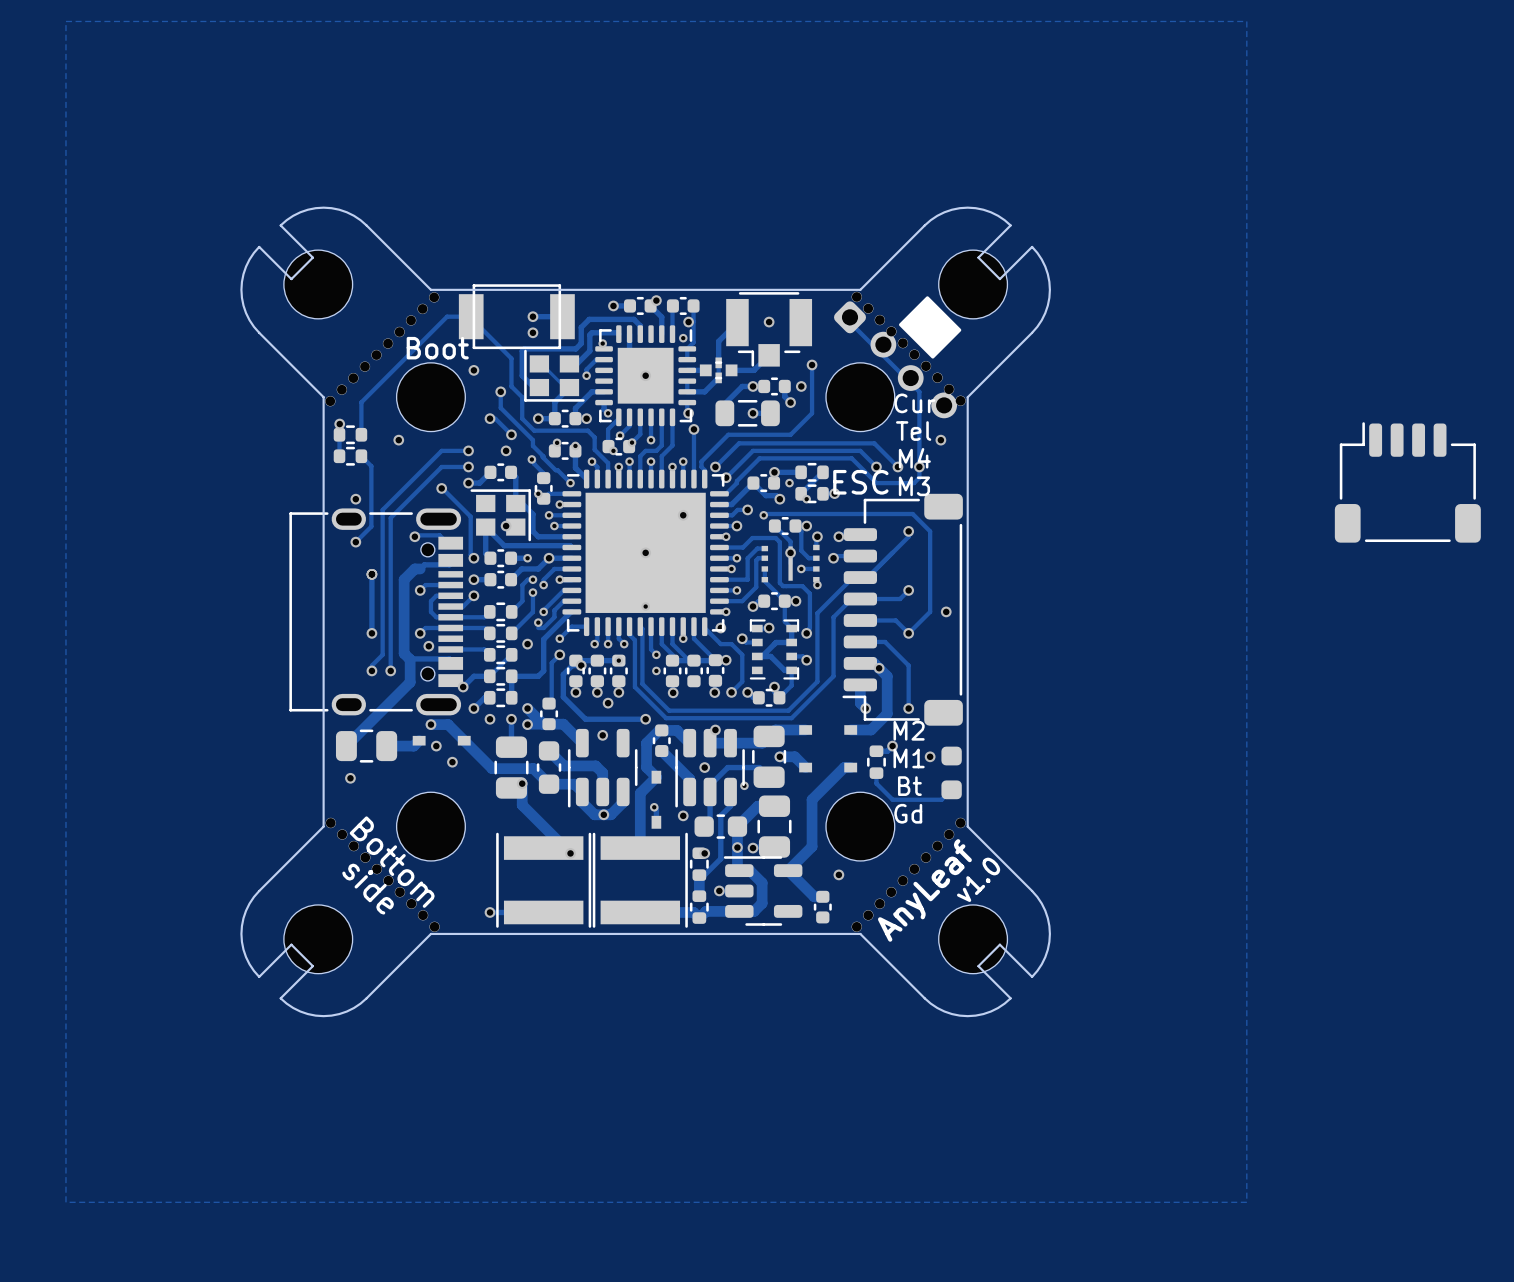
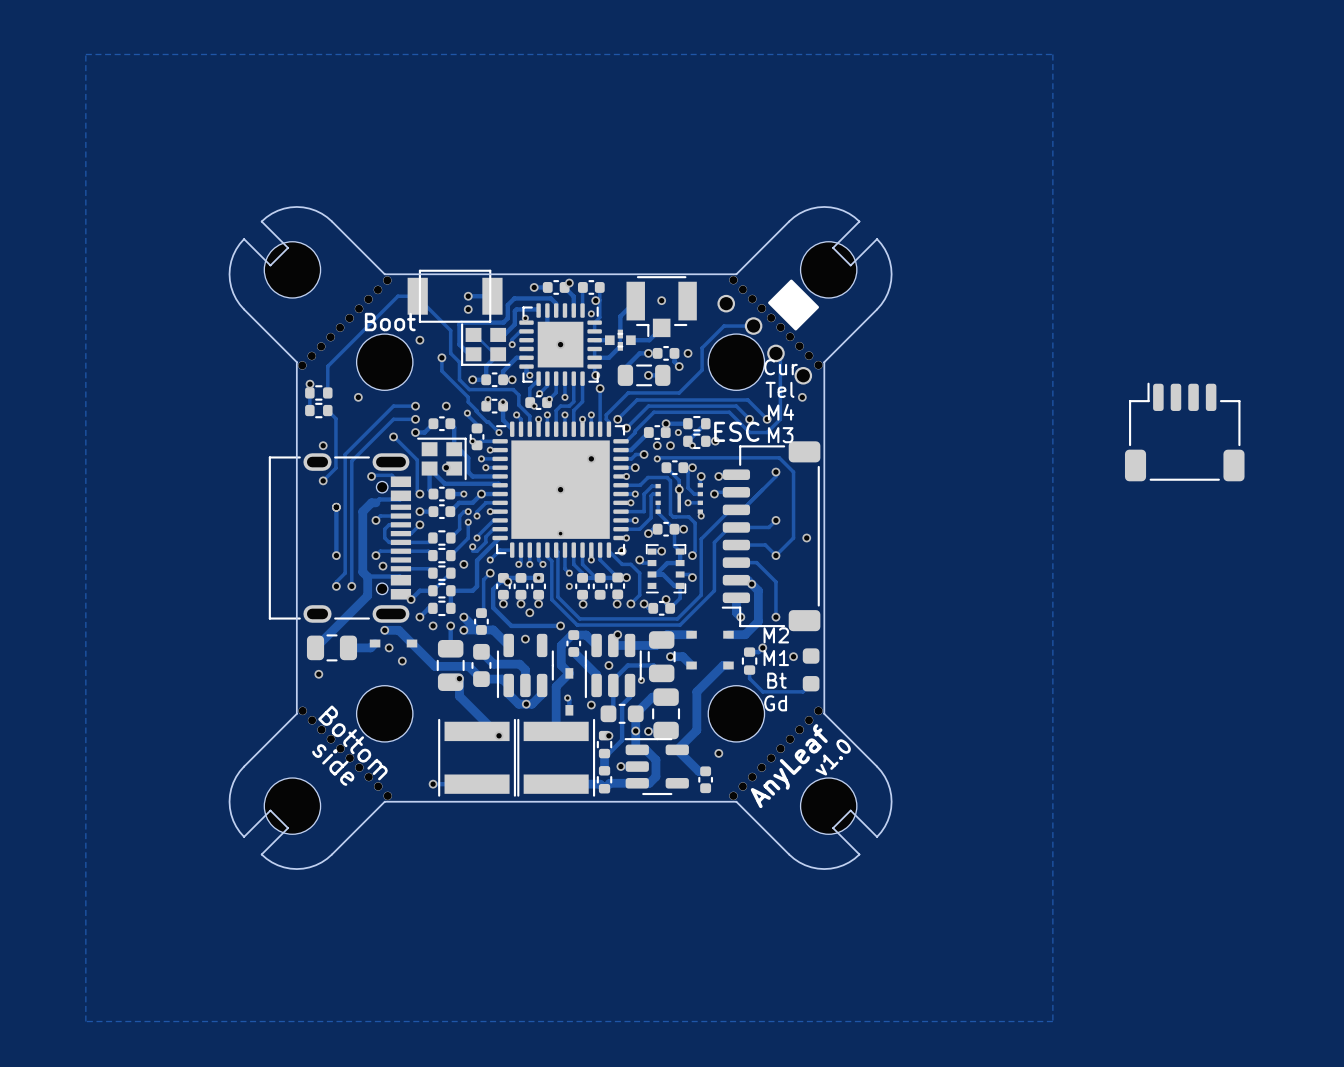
part footprint: [834, 301, 958, 419] -> [717, 294, 813, 385]
track: (849, 322) (919, 391) (919, 477) (914, 483) (897, 483) -> (775, 353) (780, 357) (780, 419) (767, 432)
track: (812, 364) (812, 413) -> (753, 326) (724, 326) (702, 347) (702, 370) (696, 375)
via: (812, 364) -> none
track: (490, 418) (495, 418) (511, 434) -> none
via: (490, 418) -> none
via: (511, 434) -> none
via: (919, 466) -> none
track: (753, 483) (765, 495) (776, 495) (779, 499) -> none
via: none -> (657, 445)

